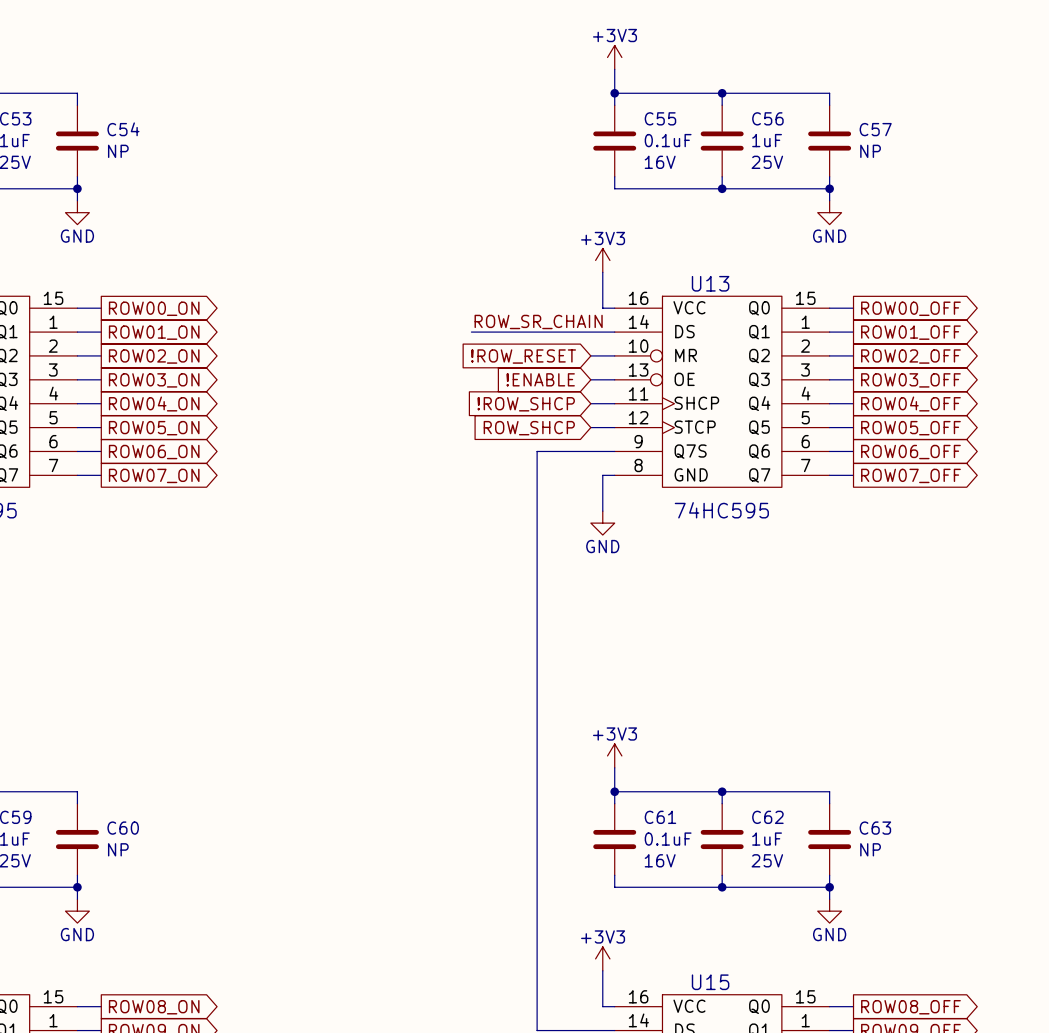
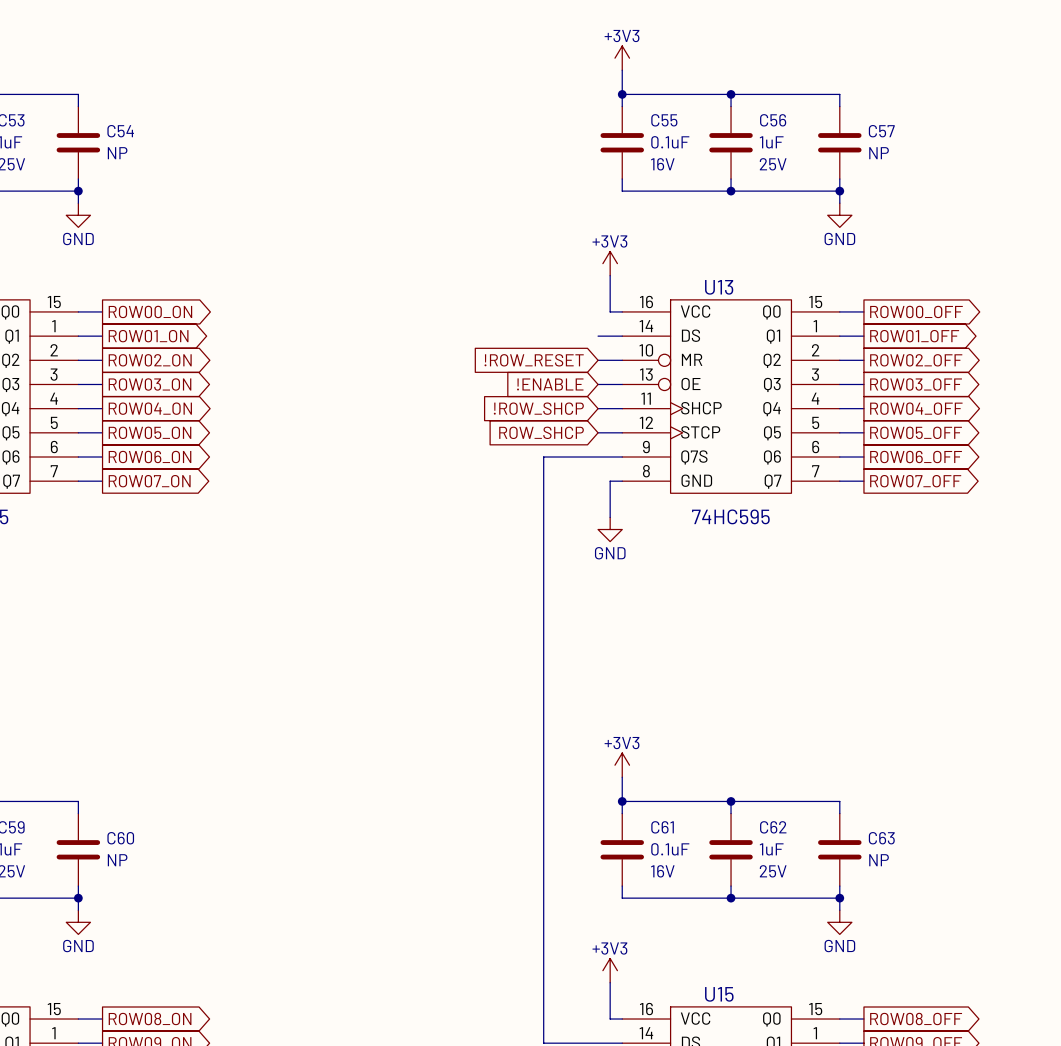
label: ROW_SR_CHAIN (538, 321) -> none
wire: (471, 332) (590, 332) -> none

